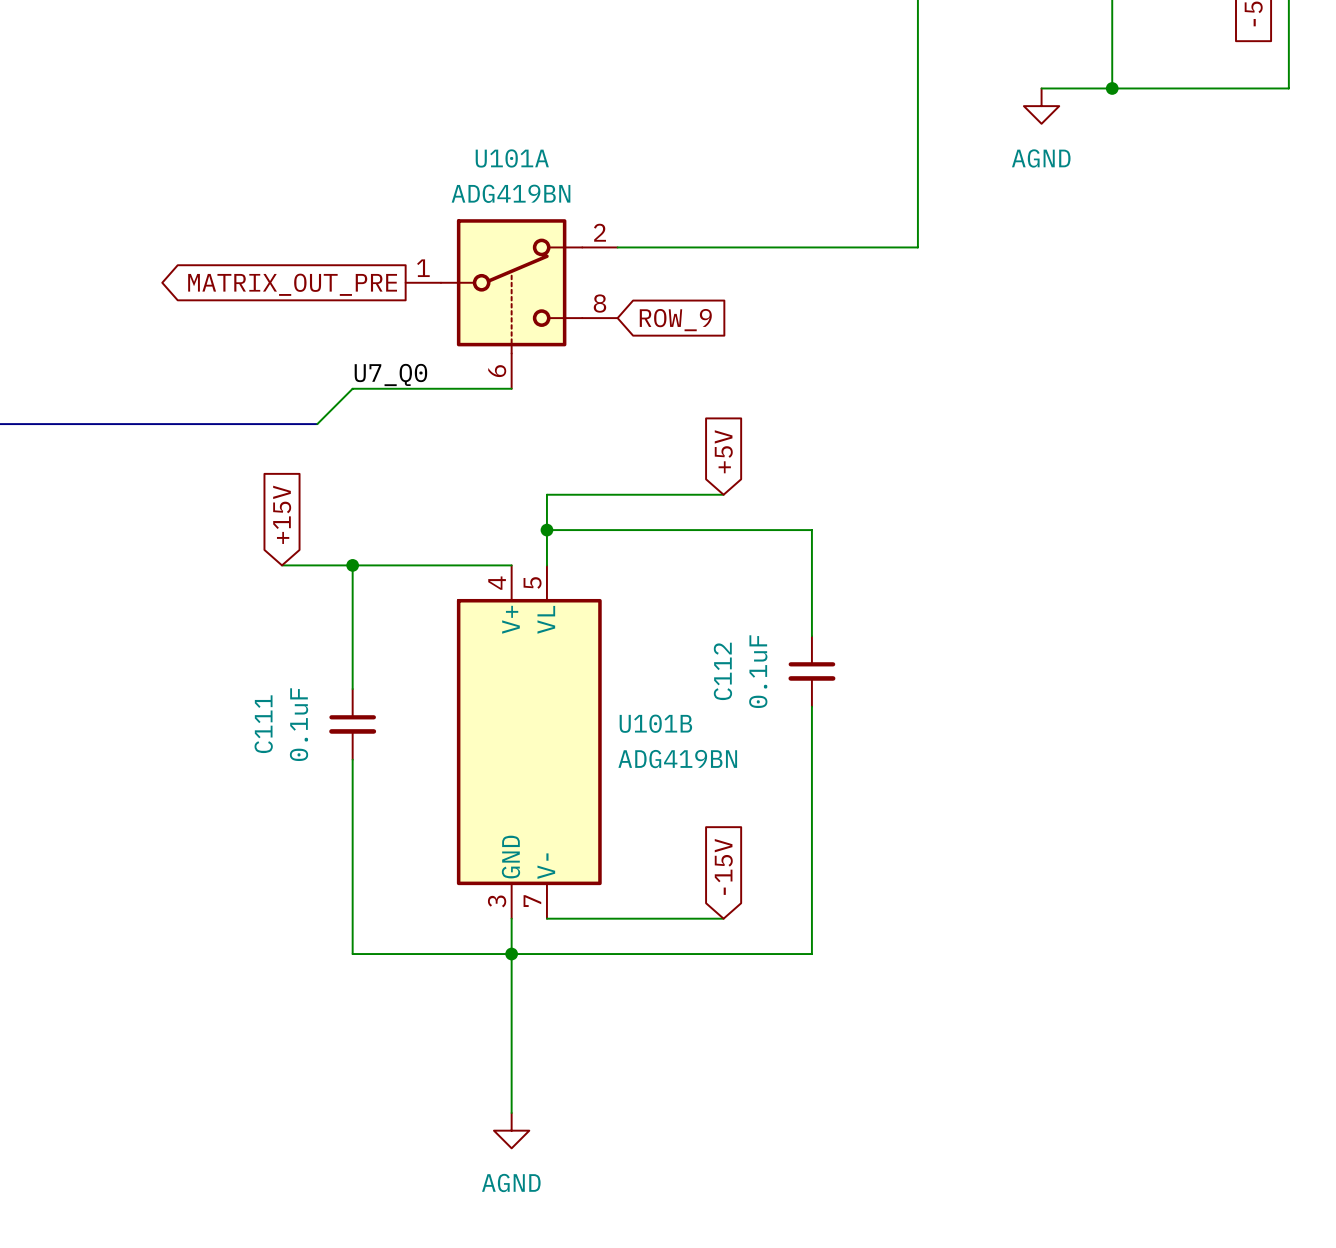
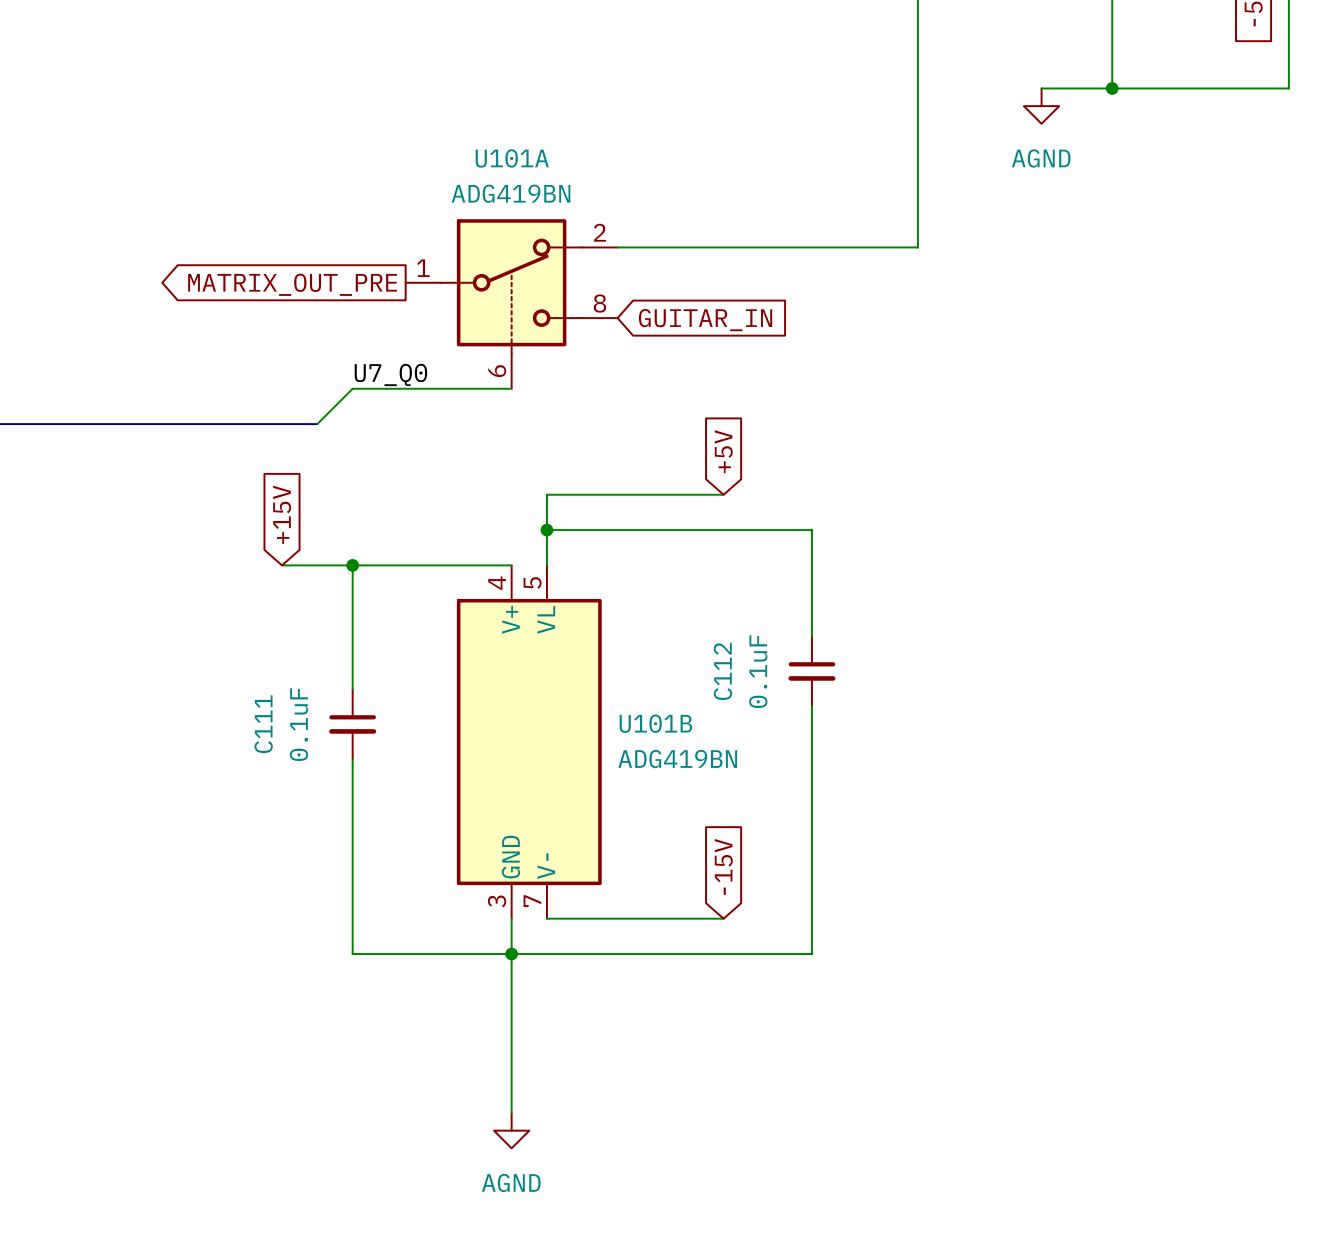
global label: ROW_9 (675, 320) -> GUITAR_IN (705, 320)

